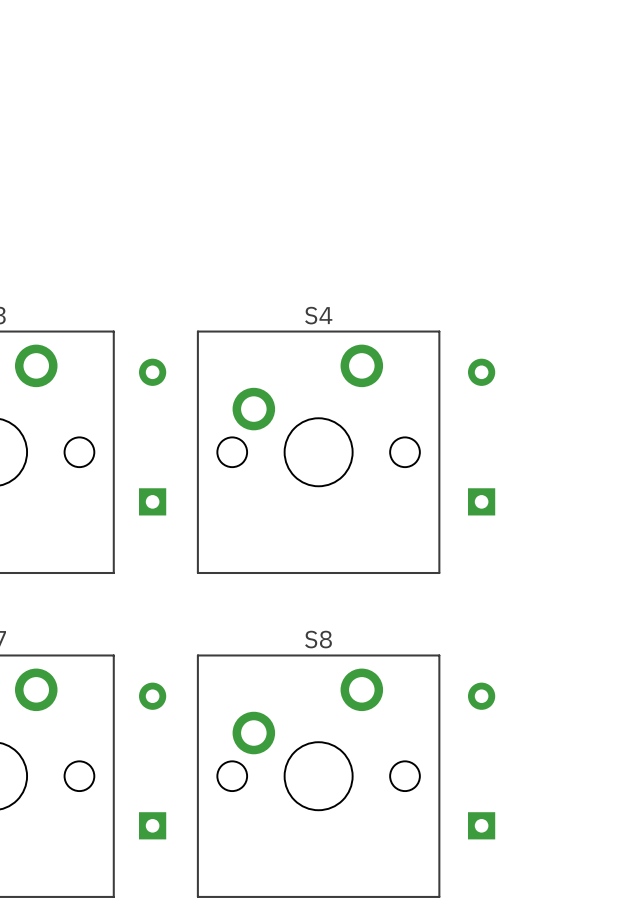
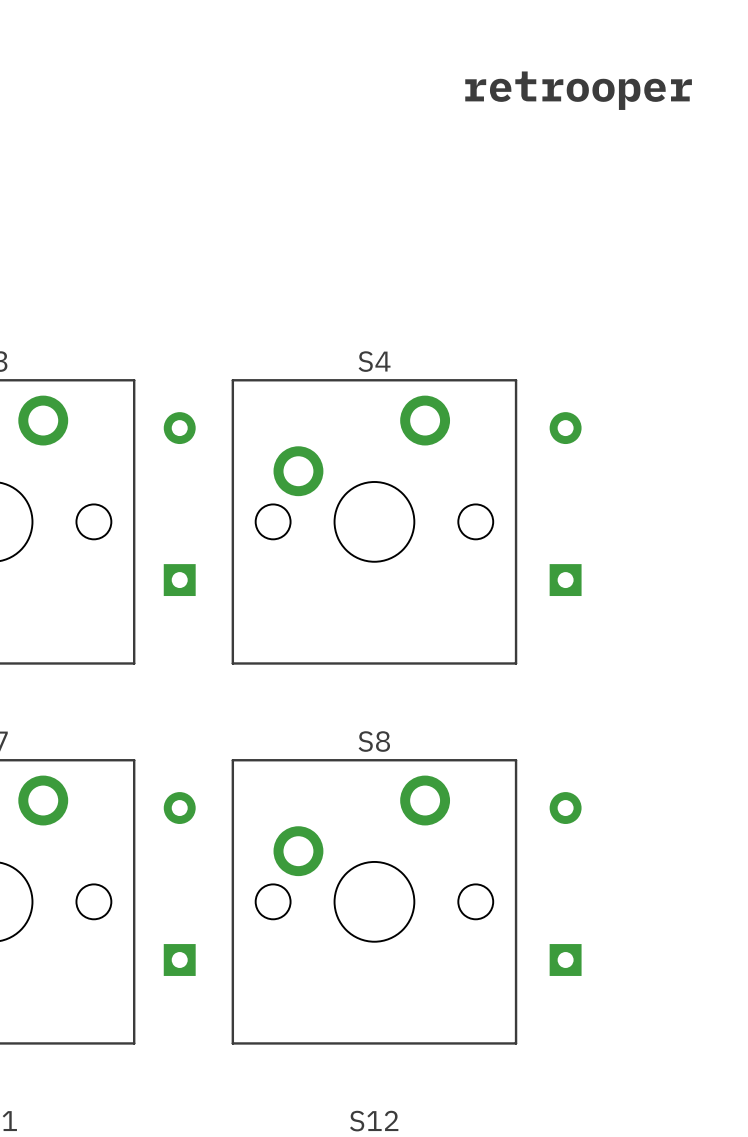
text: none -> retrooper (578, 90)

